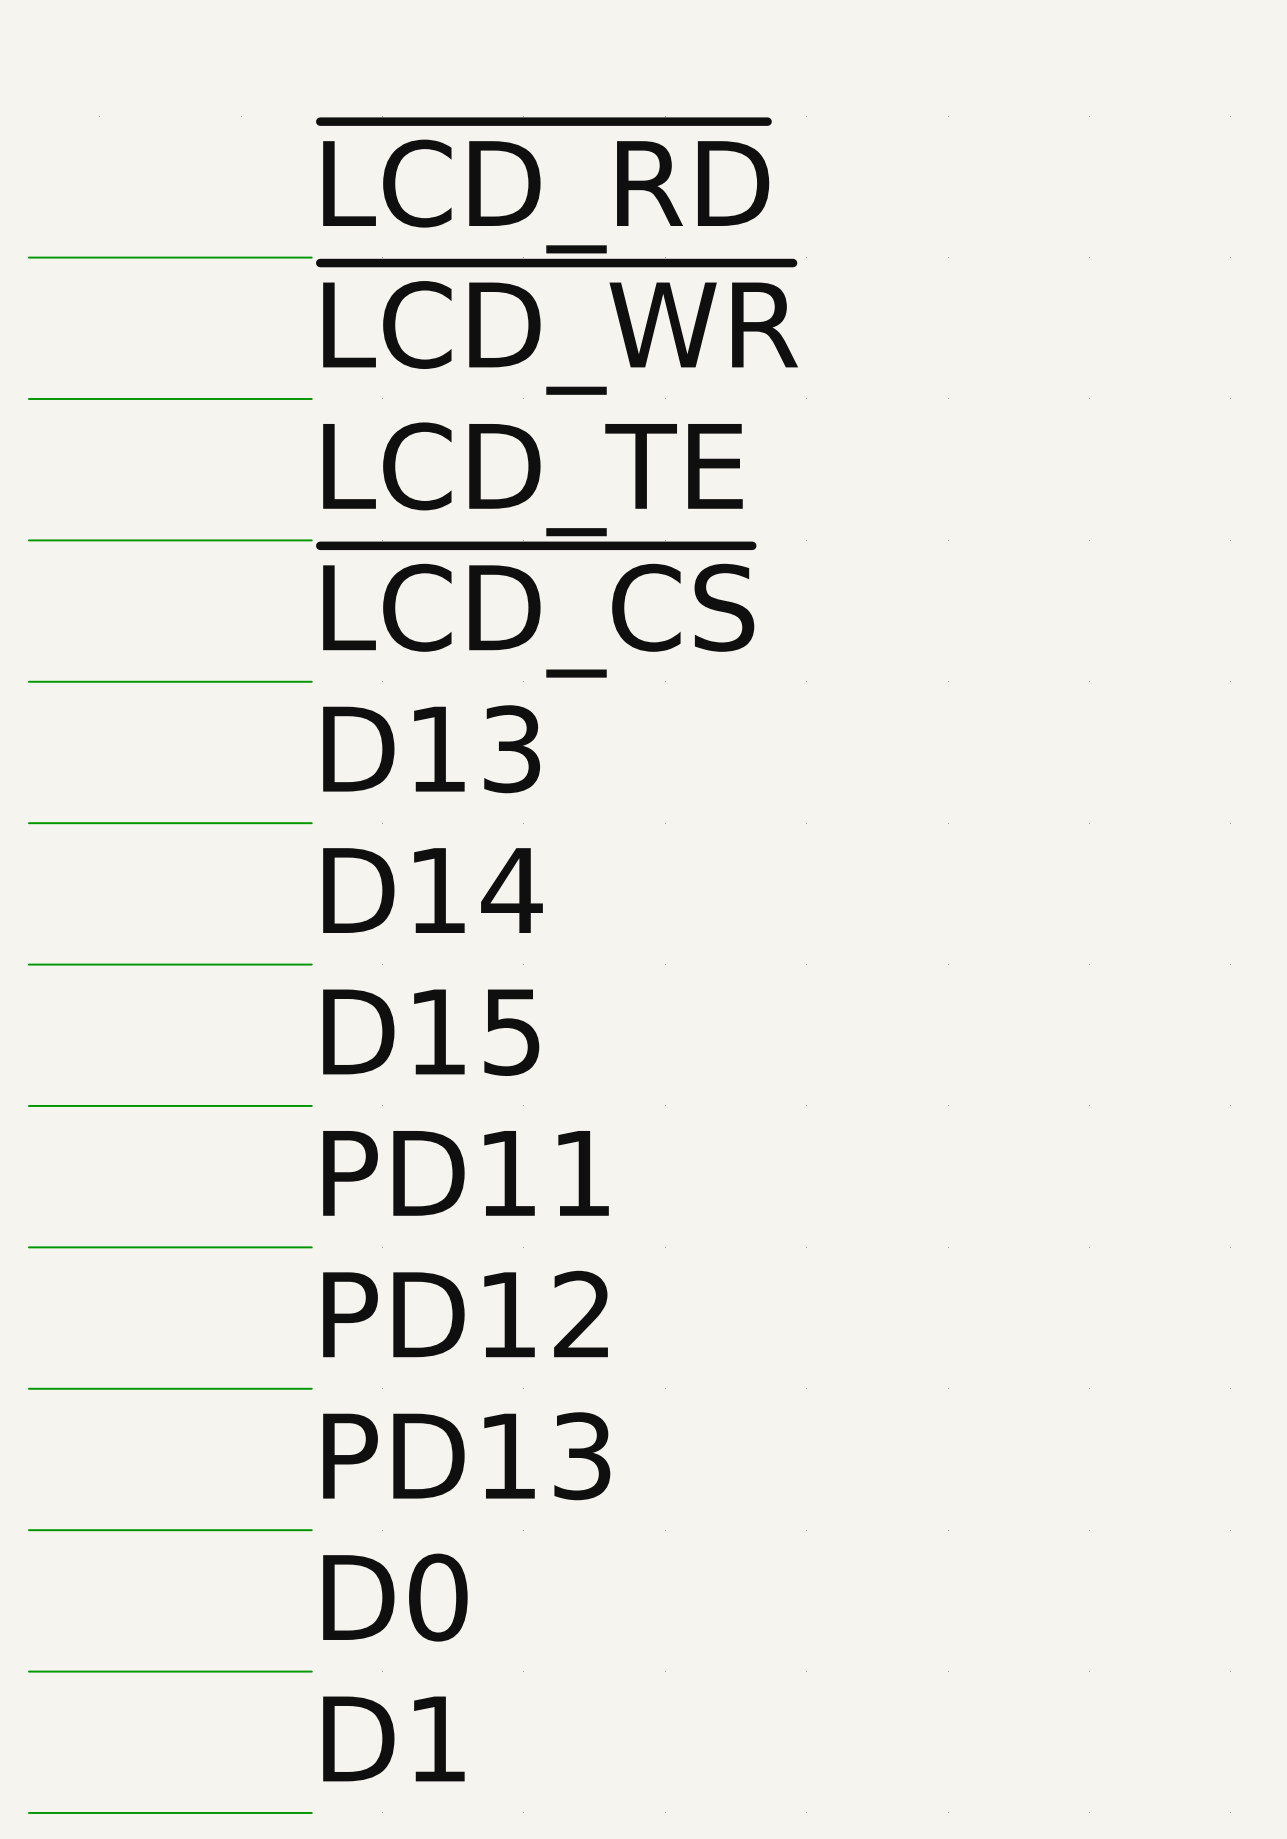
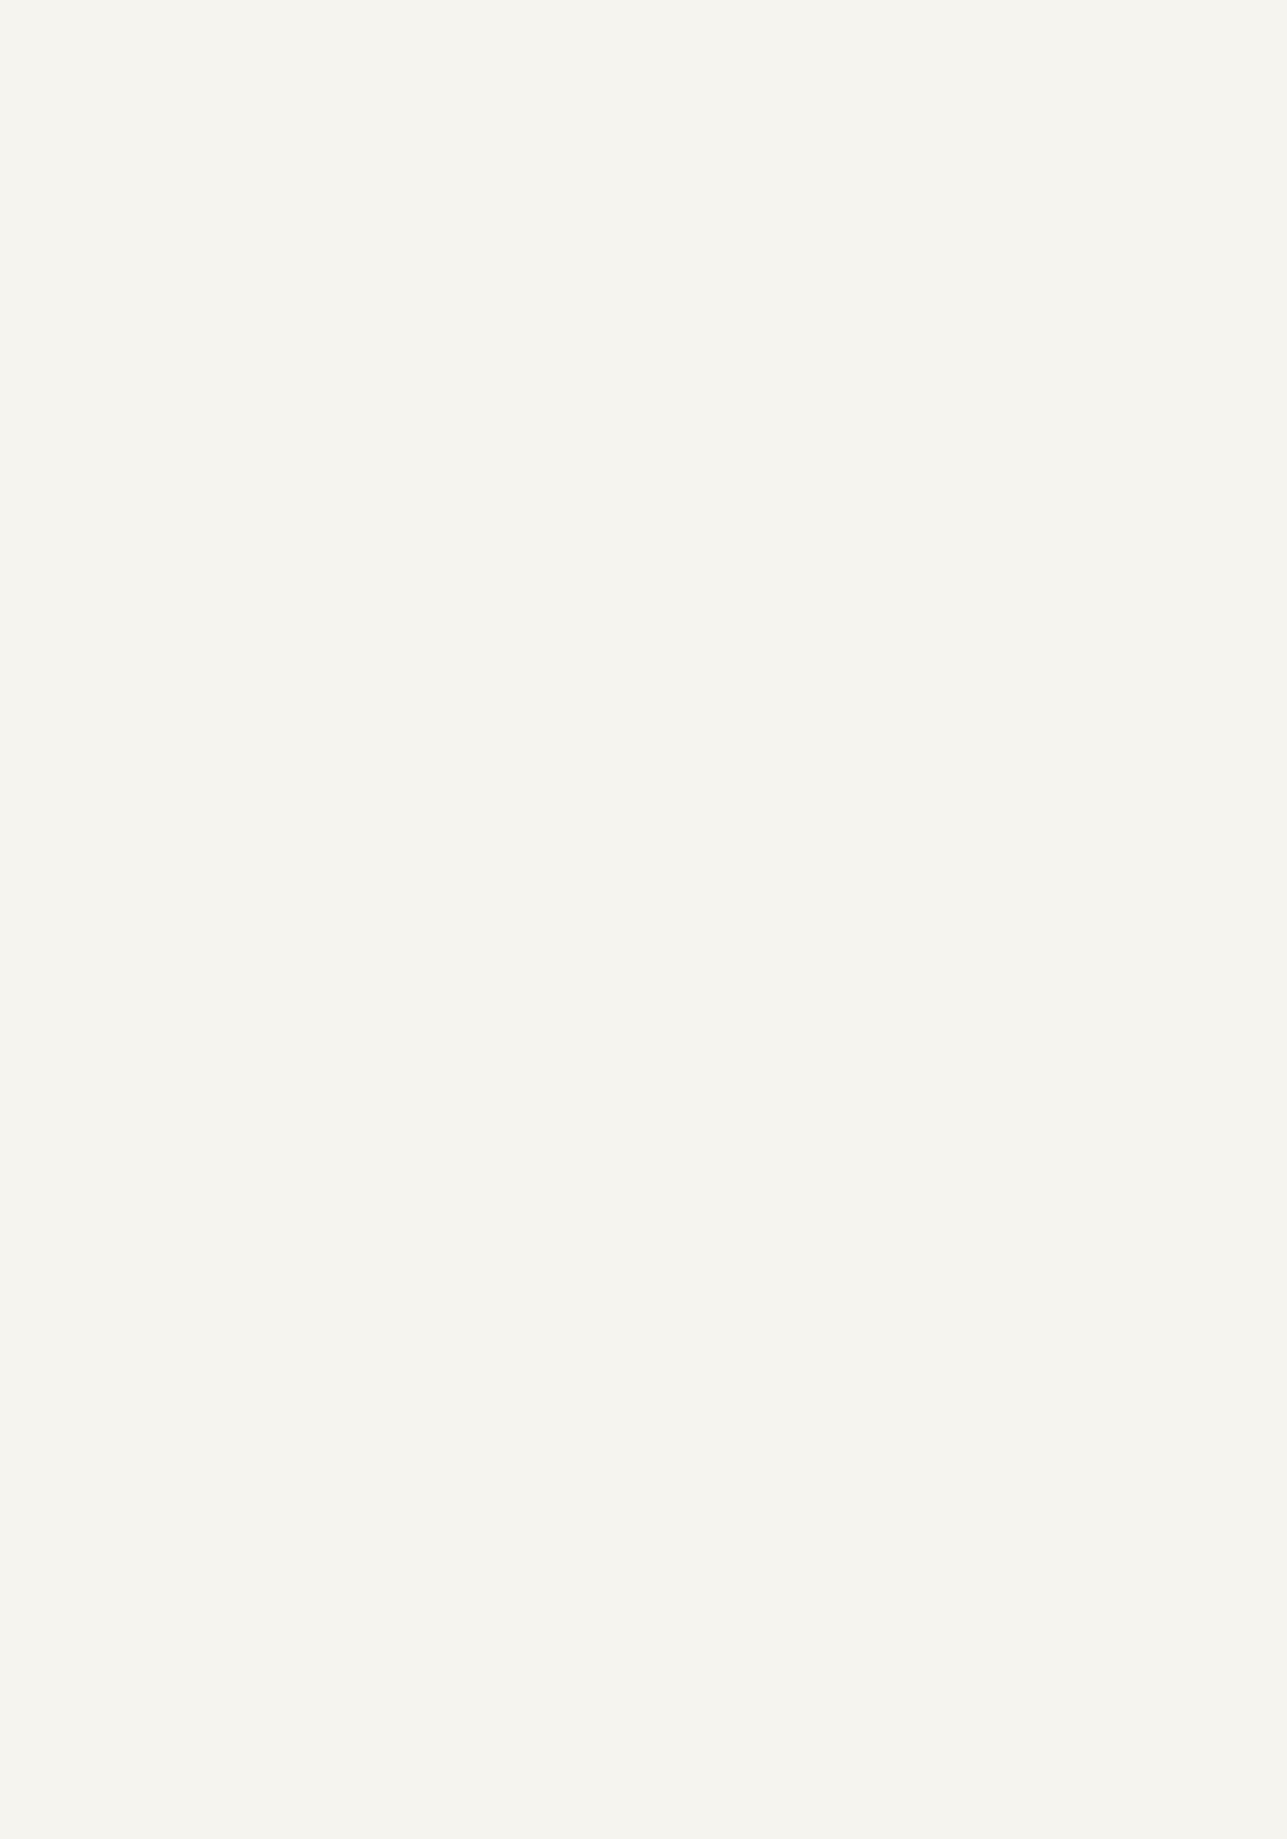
label: ~{LCD_RD} (544, 187) -> none
wire: (28, 257) (311, 257) -> none
label: ~{LCD_WR} (559, 328) -> none
wire: (28, 398) (311, 398) -> none
label: LCD_TE (532, 479) -> none
wire: (28, 540) (311, 540) -> none
label: ~{LCD_CS} (537, 611) -> none
wire: (28, 681) (311, 681) -> none
label: D13 (431, 749) -> none
wire: (28, 823) (311, 823) -> none
label: D14 (433, 890) -> none
wire: (28, 964) (311, 964) -> none
label: D15 (431, 1032) -> none
wire: (28, 1105) (311, 1105) -> none
label: PD11 (466, 1173) -> none
wire: (28, 1247) (311, 1247) -> none
label: PD12 (465, 1314) -> none
wire: (28, 1388) (311, 1388) -> none
label: PD13 (466, 1456) -> none
wire: (28, 1530) (311, 1530) -> none
label: D0 (395, 1597) -> none
wire: (28, 1671) (311, 1671) -> none
label: D1 (393, 1738) -> none
wire: (28, 1812) (311, 1812) -> none

